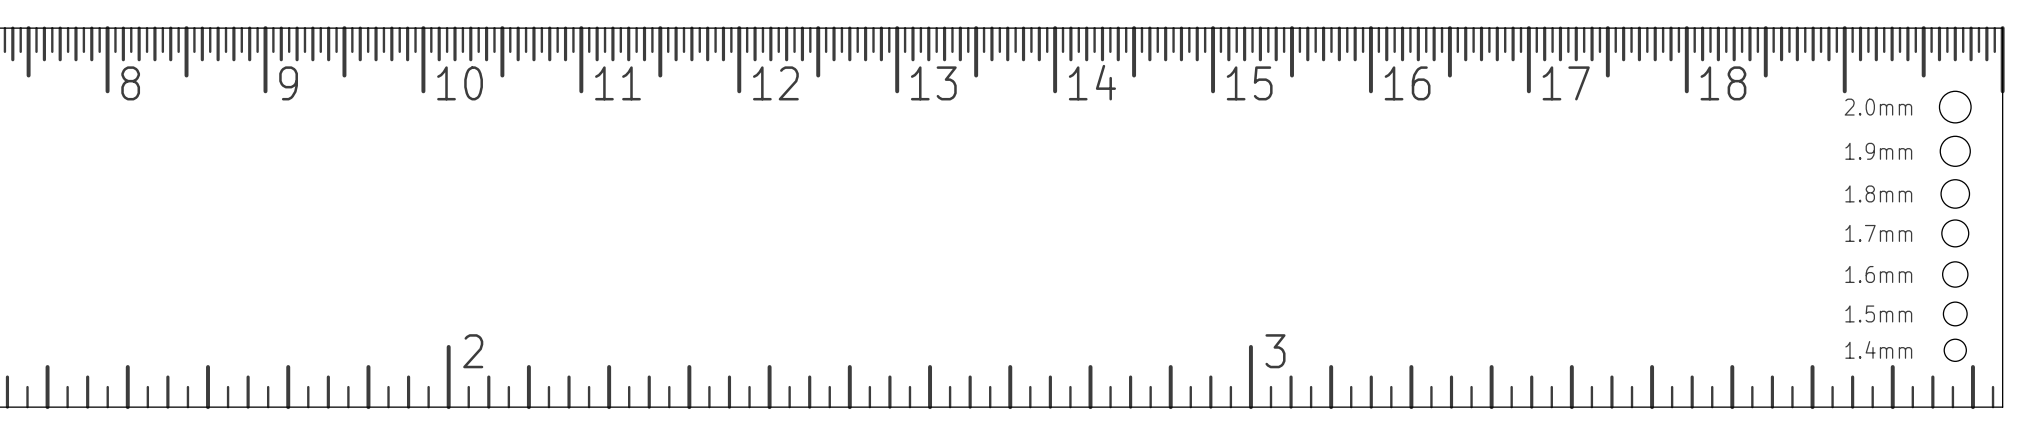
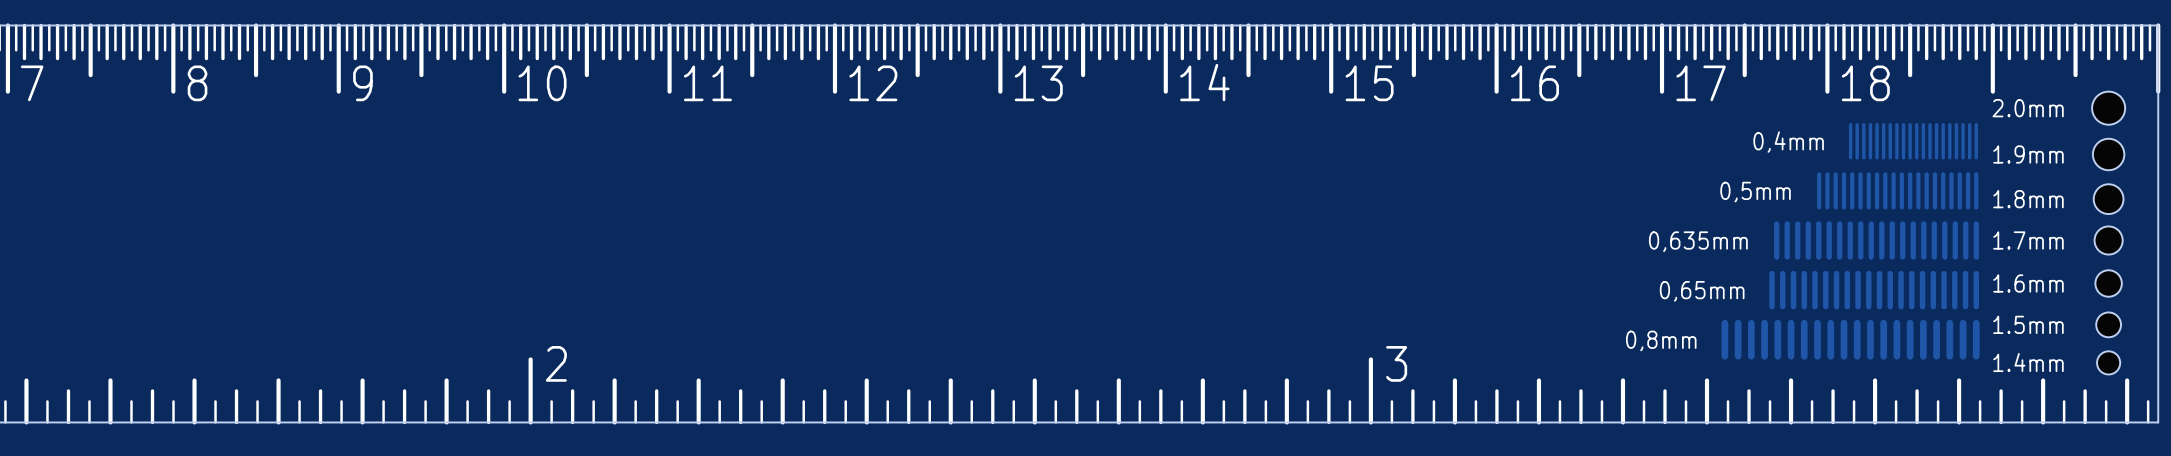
drawing: none -> [1721, 123, 1980, 360]
text: none -> 0,4mm (1788, 142)
text: none -> 0,5mm (1755, 192)
text: none -> 0,635mm (1698, 241)
text: none -> 0,65mm (1702, 291)
text: none -> 0,8mm (1661, 340)

